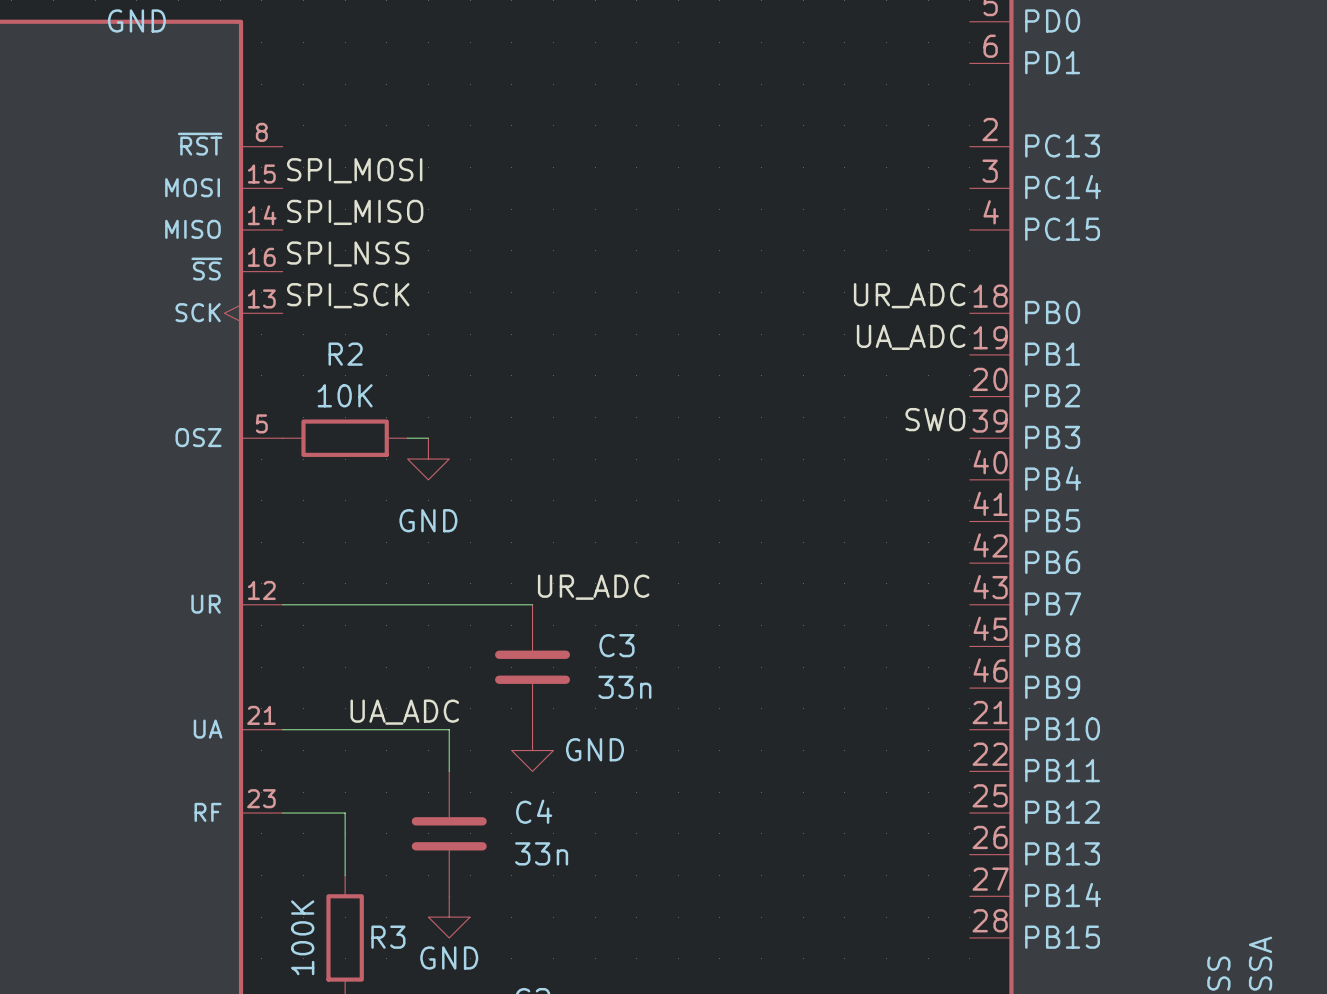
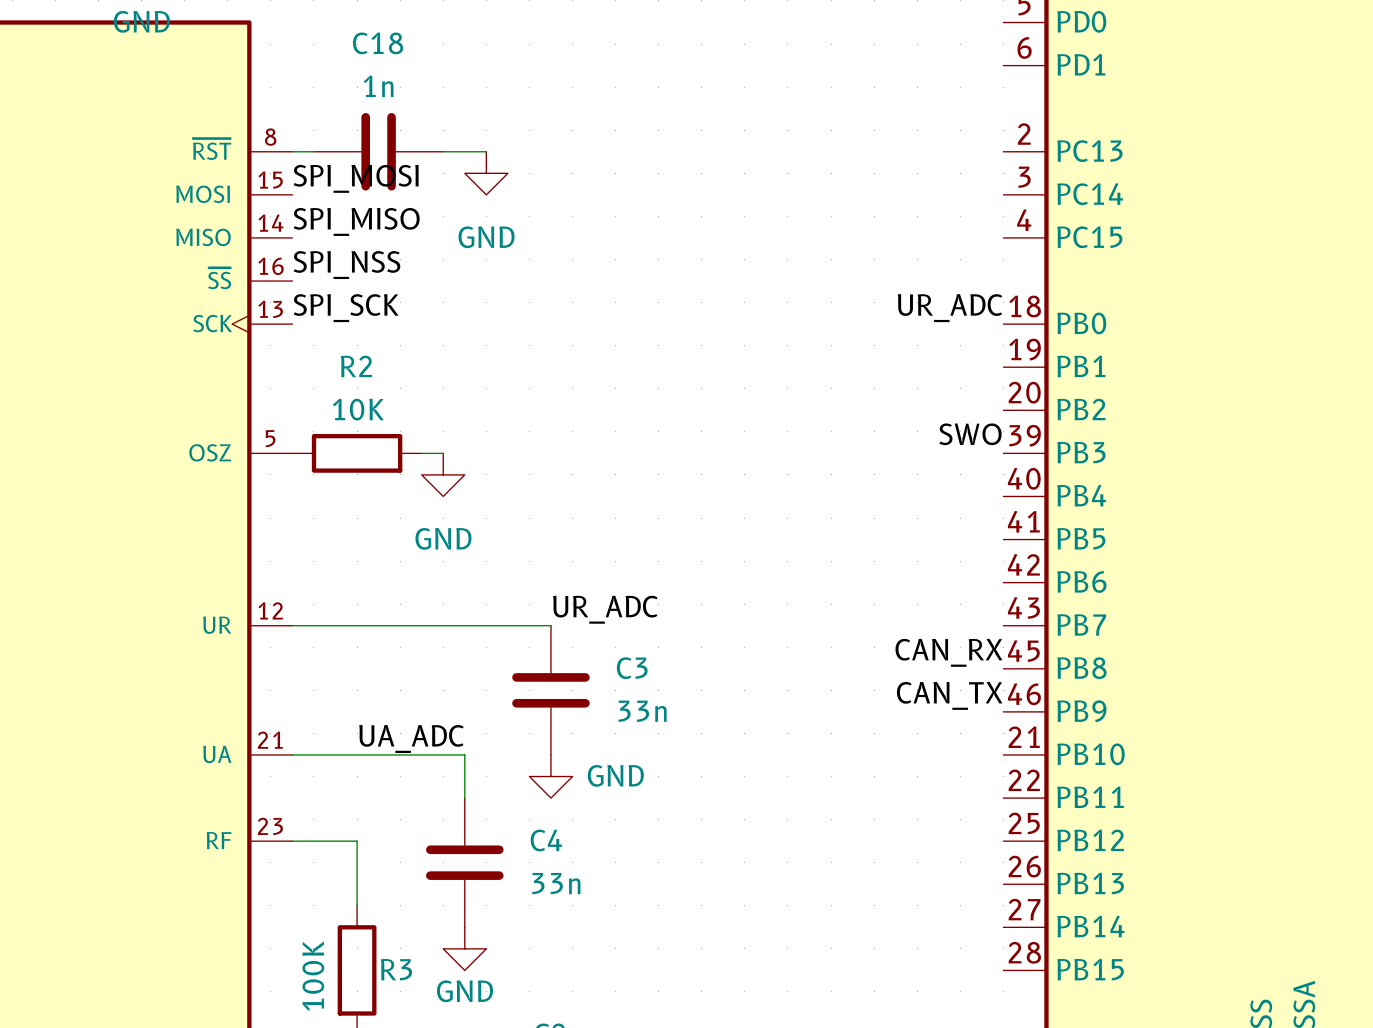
wire: none -> (292, 151) (313, 151)
C18: none -> 1n (378, 151)
wire: none -> (443, 151) (486, 151)
power symbol: none -> GND (486, 173)
label: UA_ADC (911, 337) -> none
label: none -> CAN_RX (948, 652)
label: none -> CAN_TX (949, 695)

